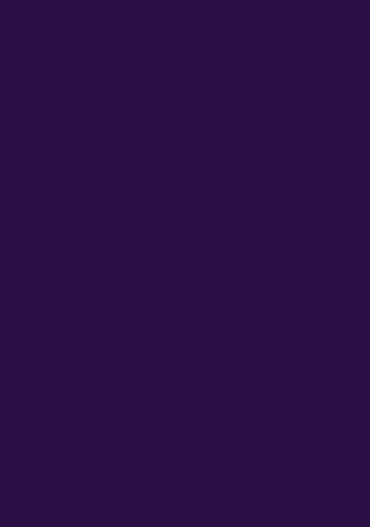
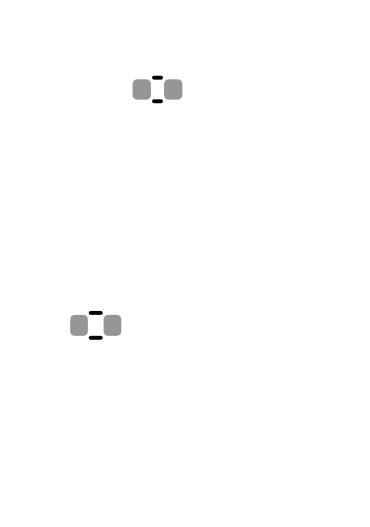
part: none -> (157, 89)
part: none -> (95, 325)

